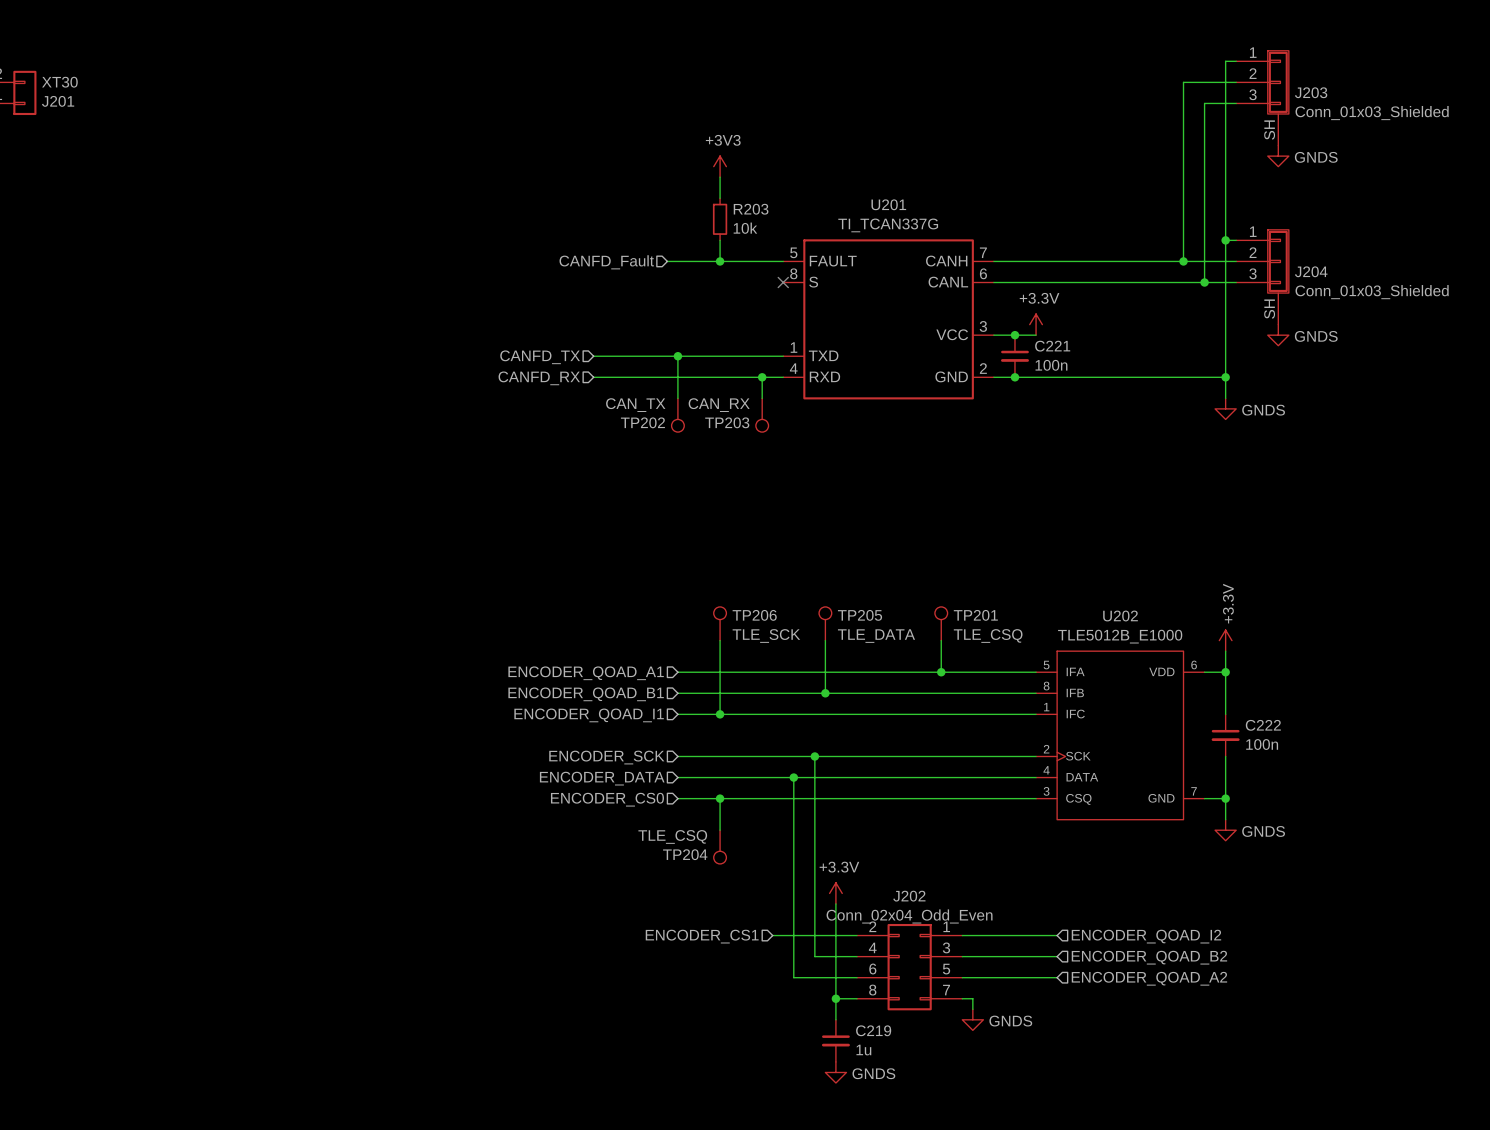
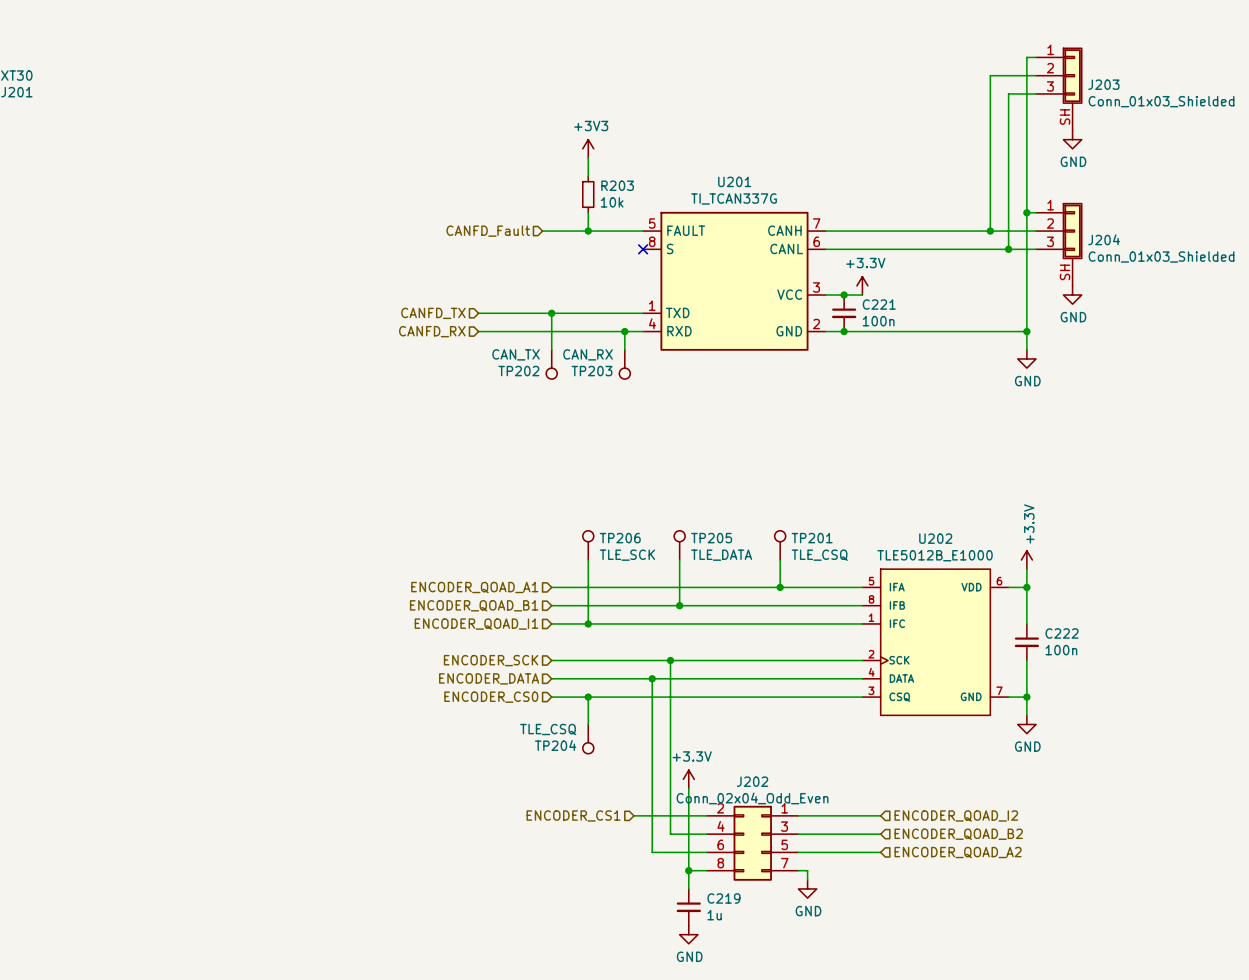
power symbol: GNDS (1278, 156) -> GND (1072, 139)
power symbol: GNDS (1278, 335) -> GND (1072, 295)
power symbol: GNDS (1225, 408) -> GND (1026, 358)
power symbol: GNDS (1225, 830) -> GND (1026, 724)
power symbol: GNDS (972, 1019) -> GND (807, 888)
power symbol: GNDS (835, 1072) -> GND (688, 934)

